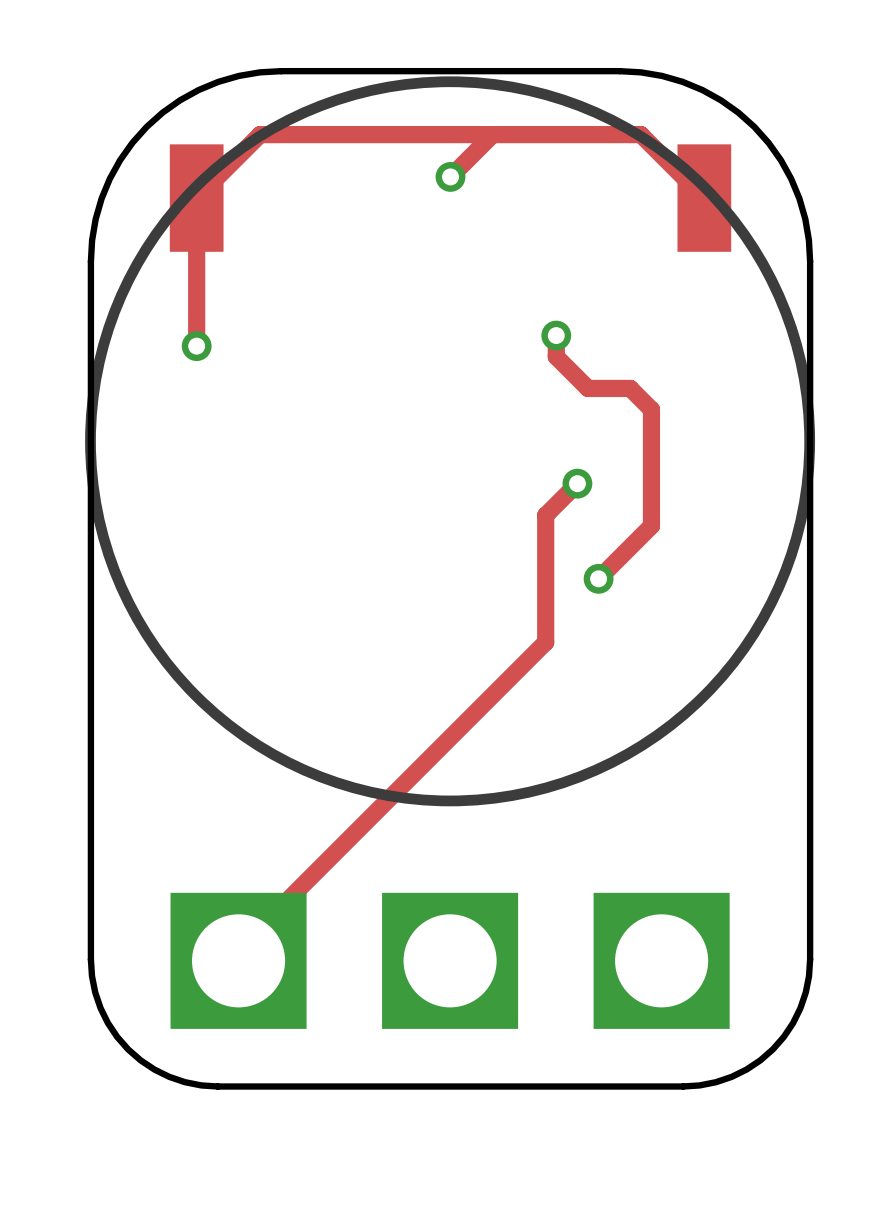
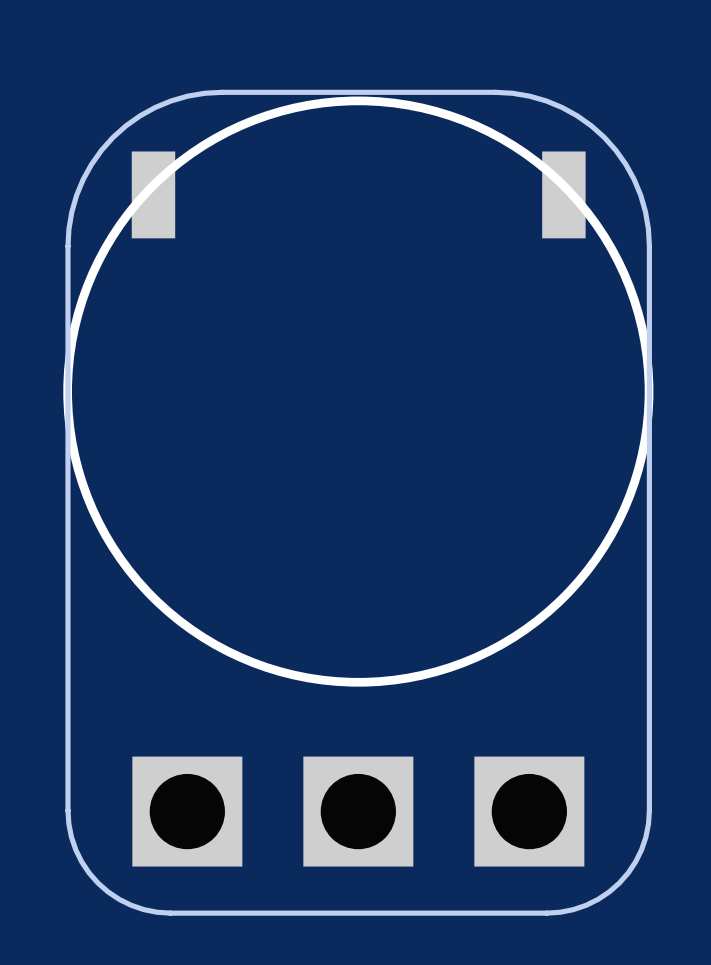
track: (492, 134) (450, 176) -> none
via: (450, 176) -> none
track: (704, 198) (640, 134) (260, 134) (196, 198) (196, 346) -> none
track: (556, 335) (556, 356) (588, 388) (630, 388) (651, 409) (651, 525) (598, 578) -> none
via: (556, 335) -> none
via: (196, 346) -> none
track: (577, 483) (545, 515) (545, 642) (238, 949) (238, 960) -> none
via: (577, 483) -> none
via: (598, 578) -> none

